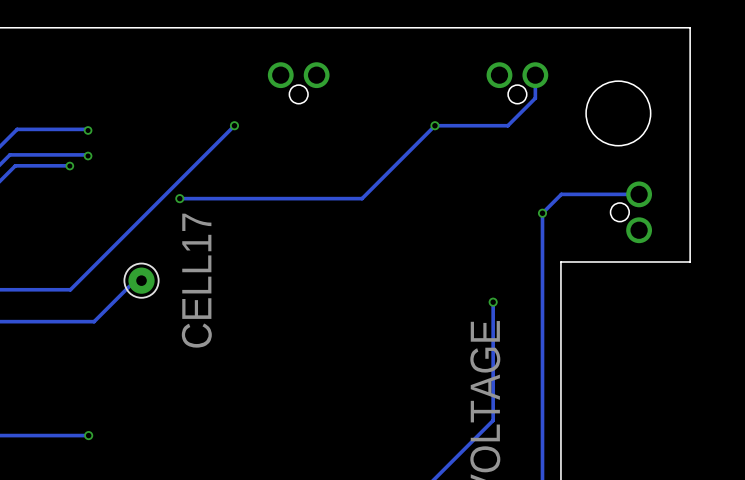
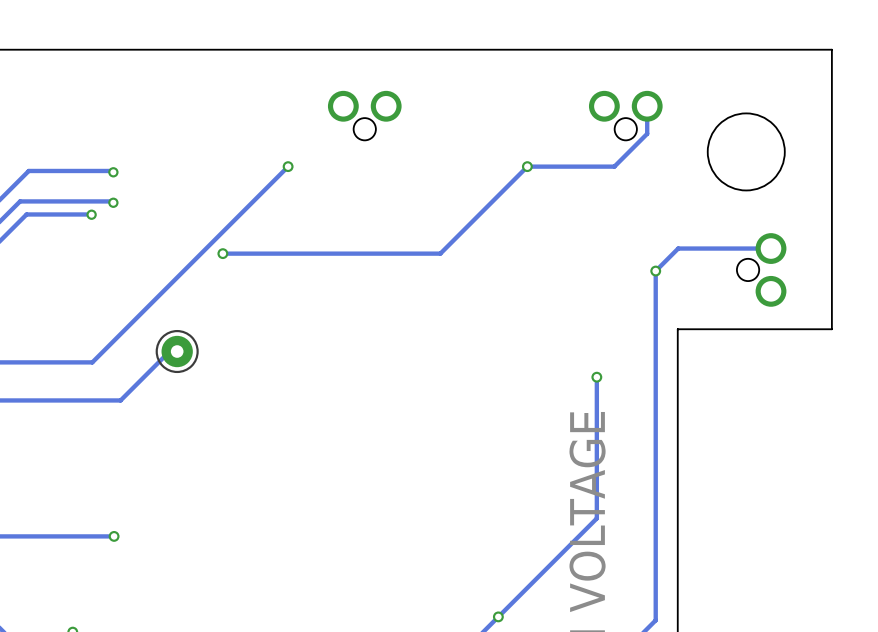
CELL17 name: CELL17 (196, 280) -> none

